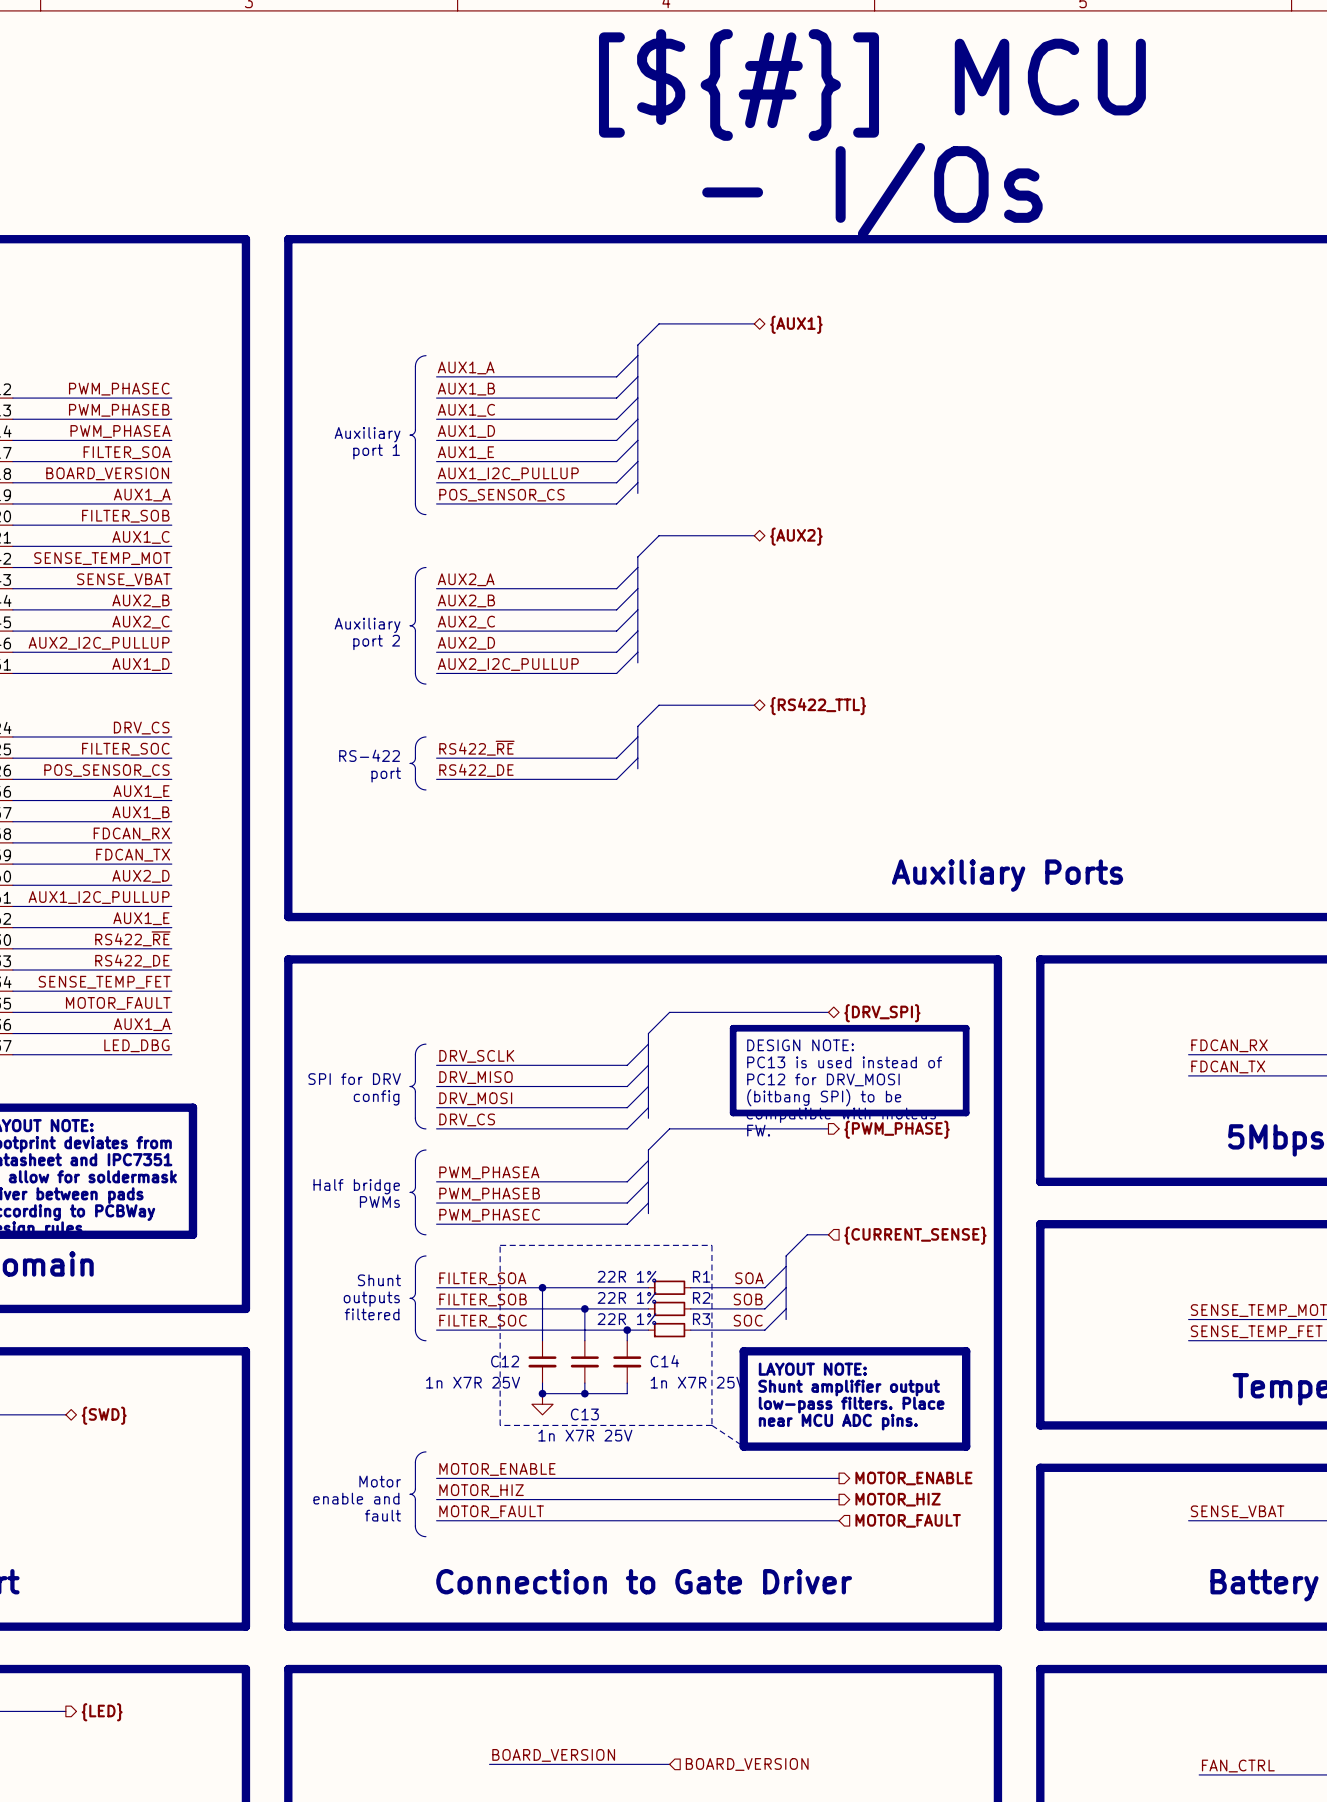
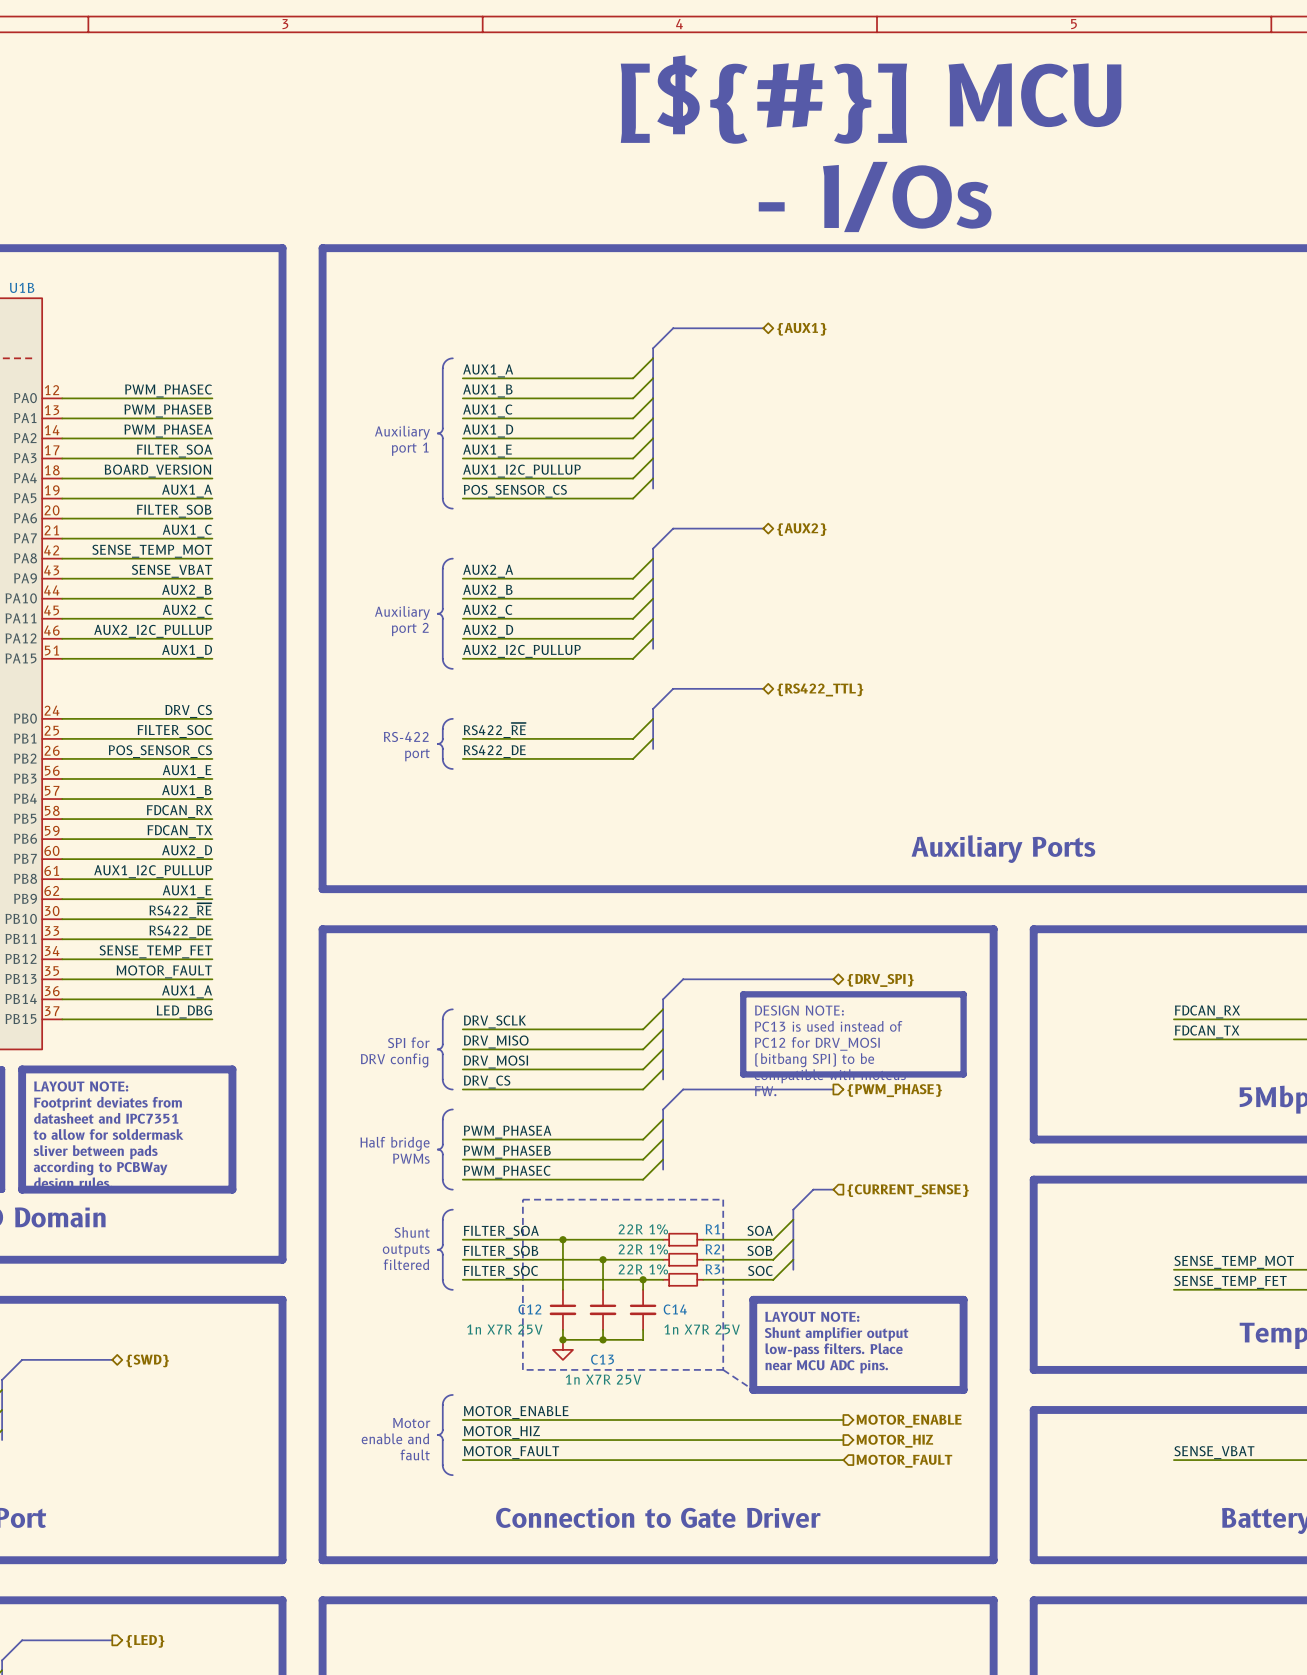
text: SPI for DRV (354, 1079) -> SPI for (408, 1042)
text: config (376, 1097) -> DRV config (394, 1060)

